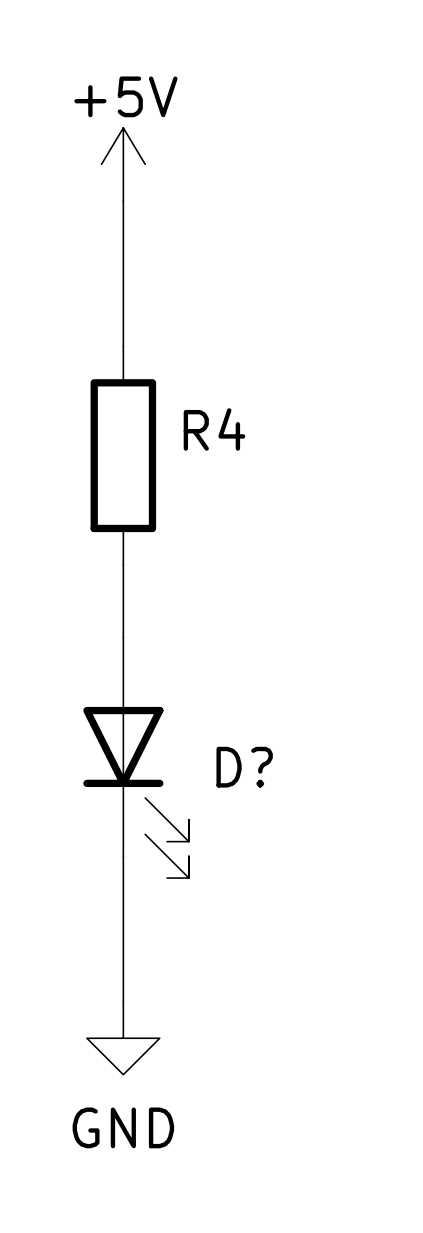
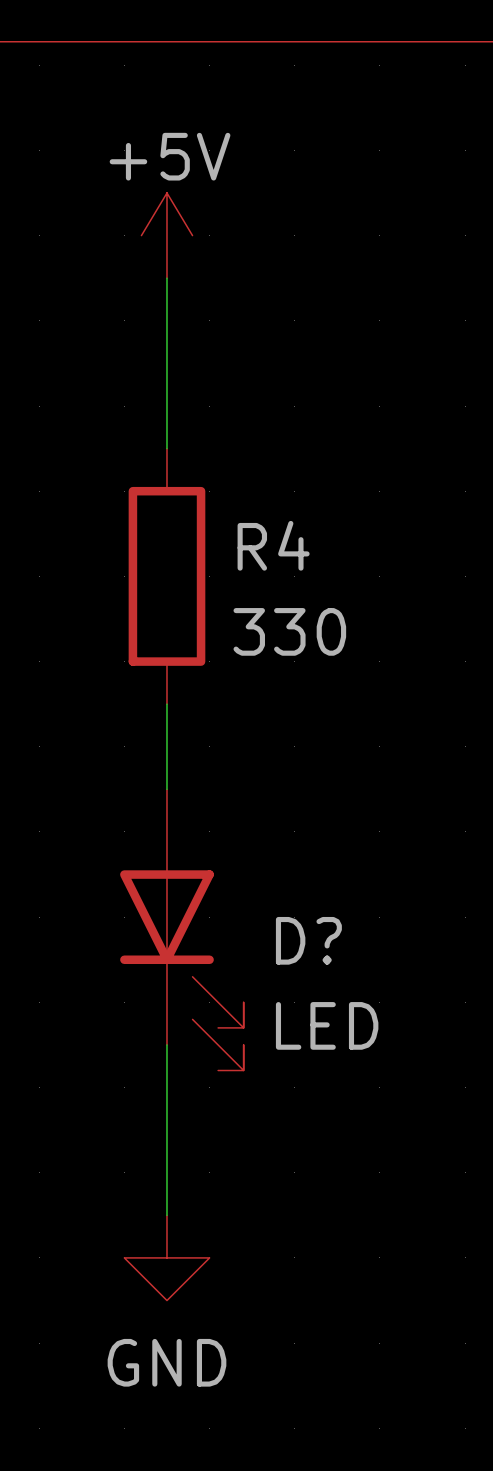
R4 value: none -> 330 (289, 631)
D? value: none -> LED (327, 1025)

